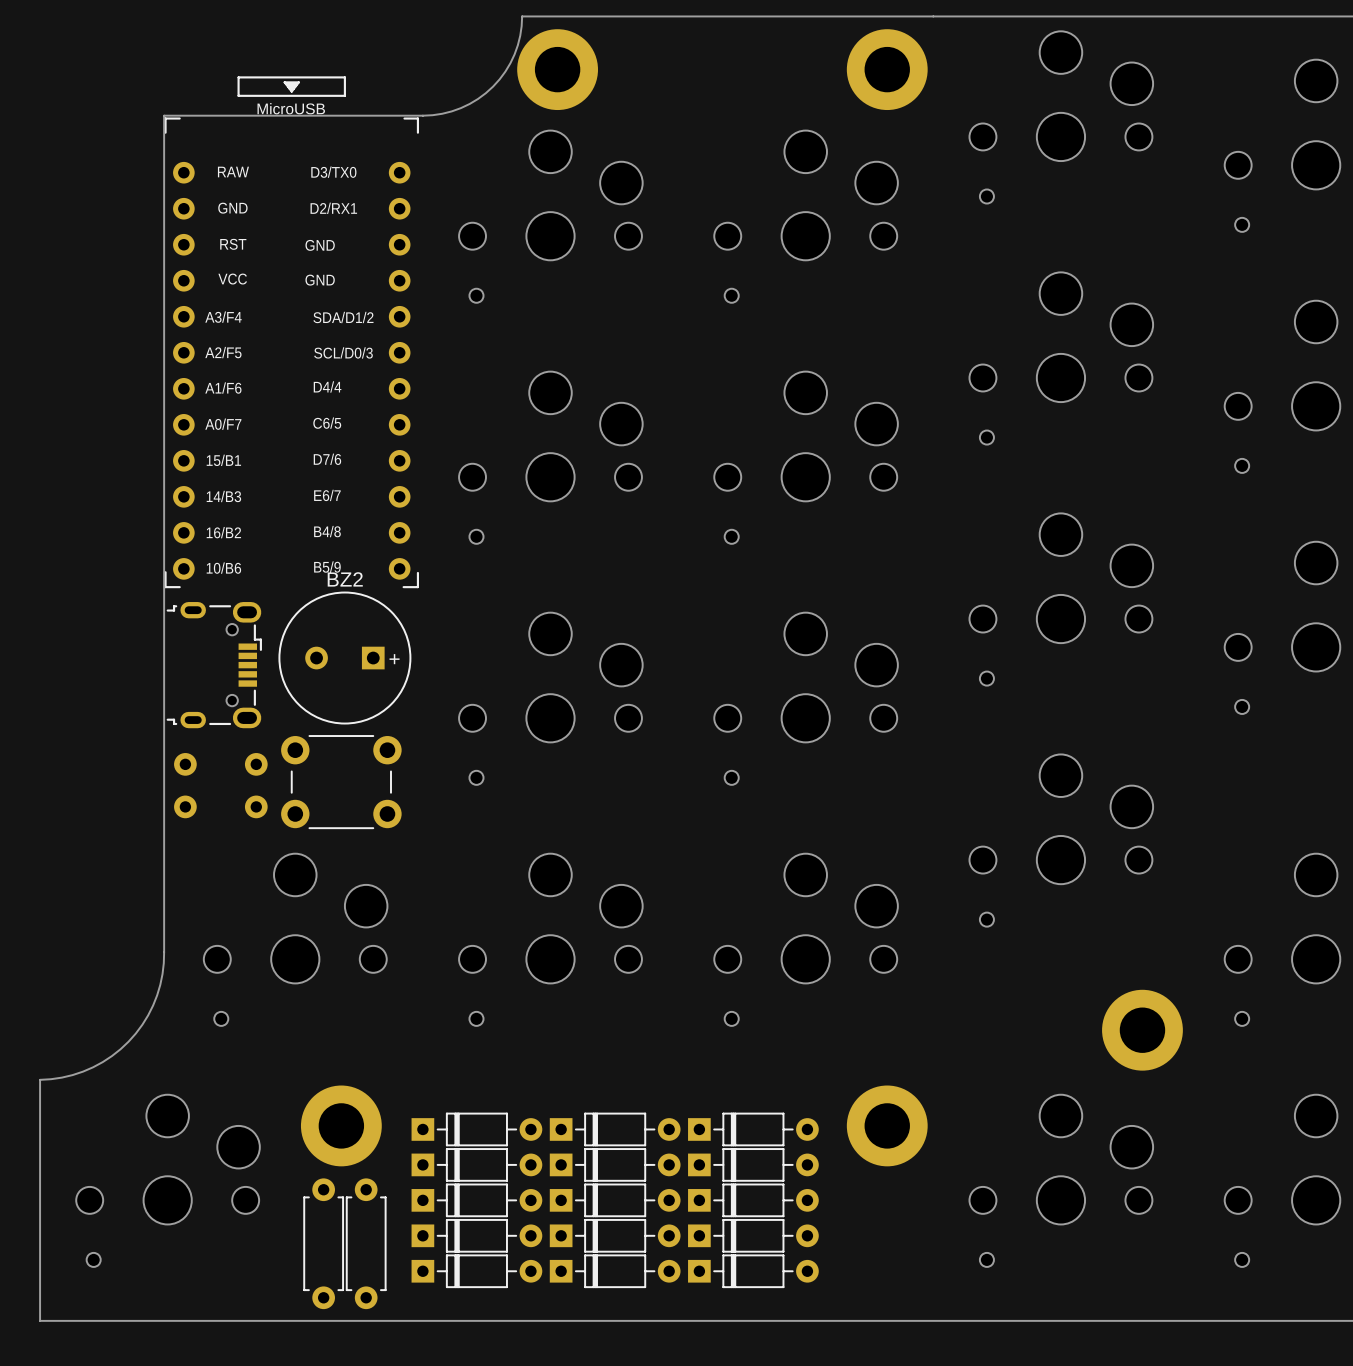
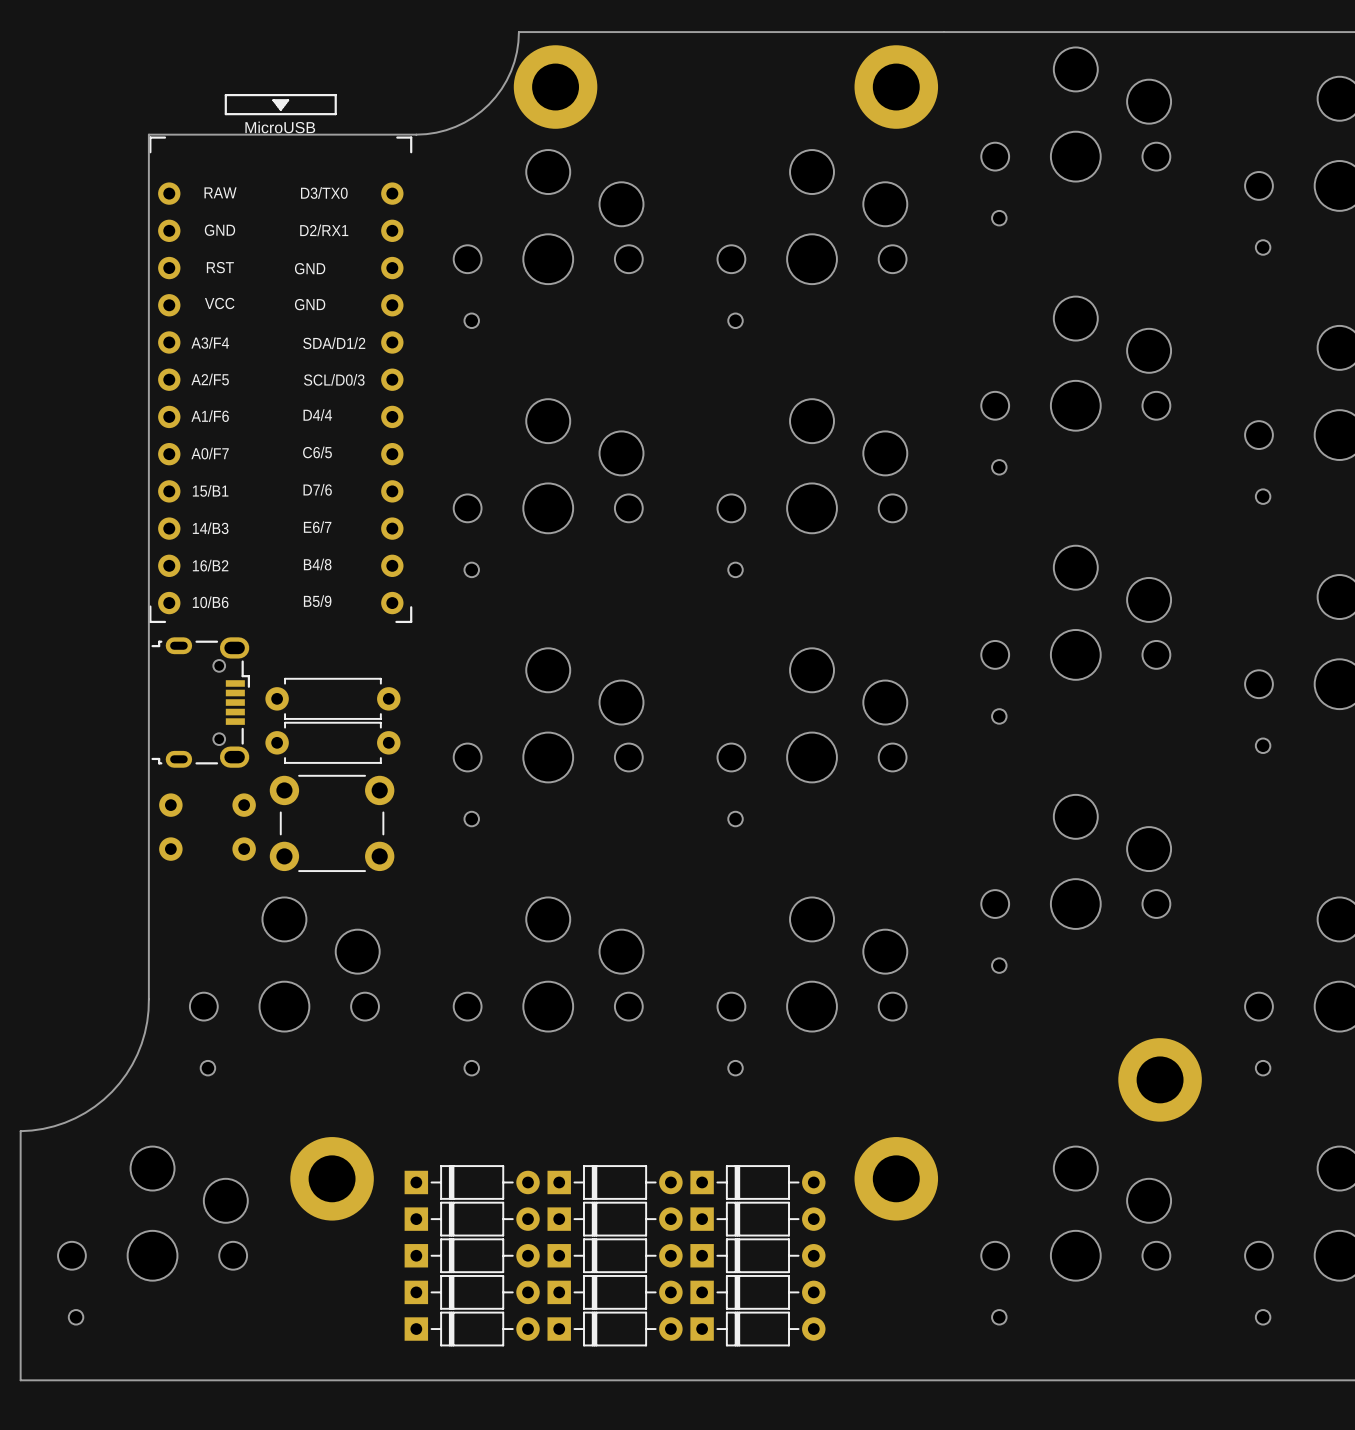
BZ2: (344, 658) -> none
part: none -> (332, 698)
part: none -> (332, 742)
part: (323, 1243) -> none
part: (366, 1243) -> none

